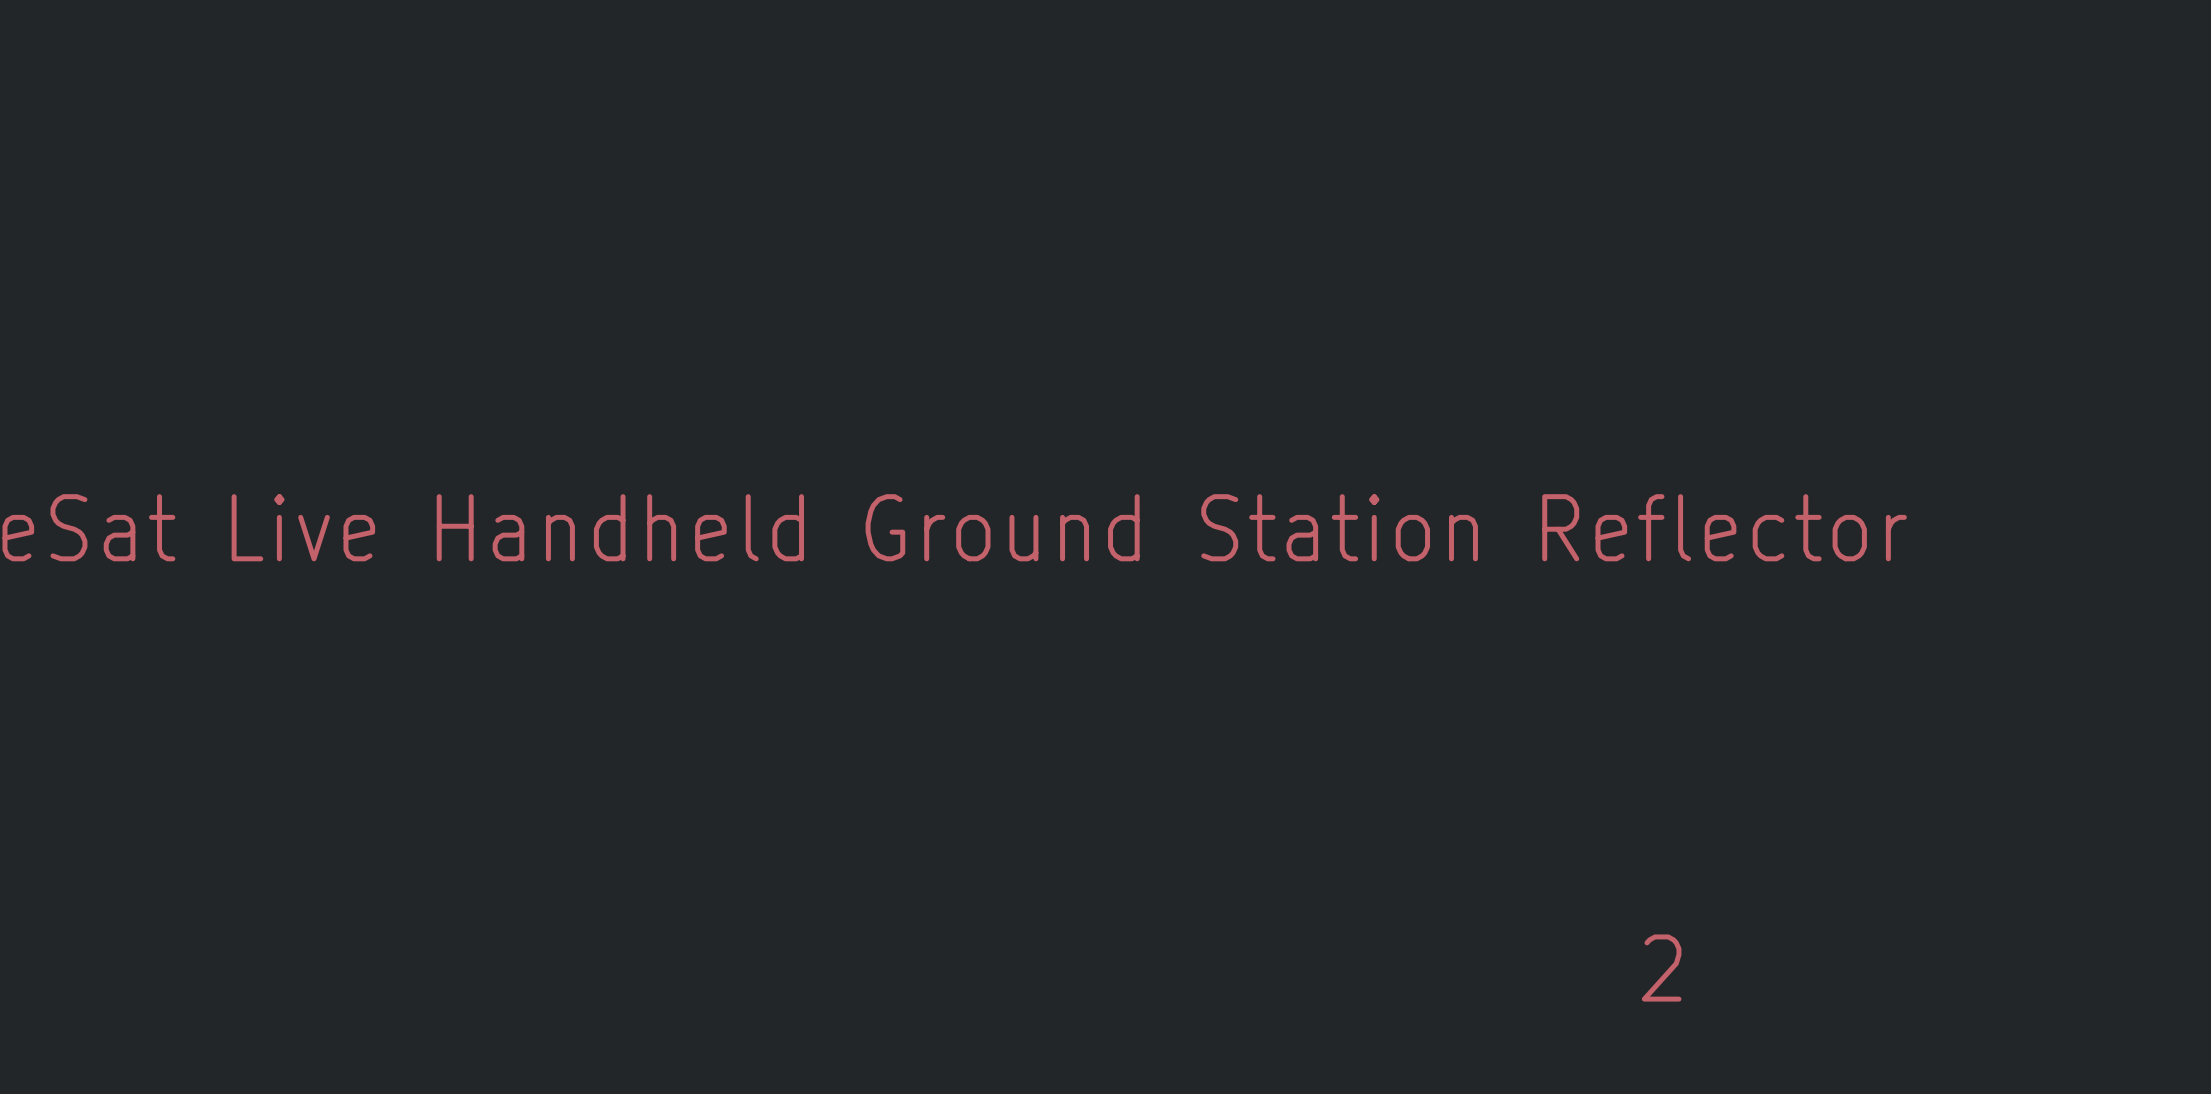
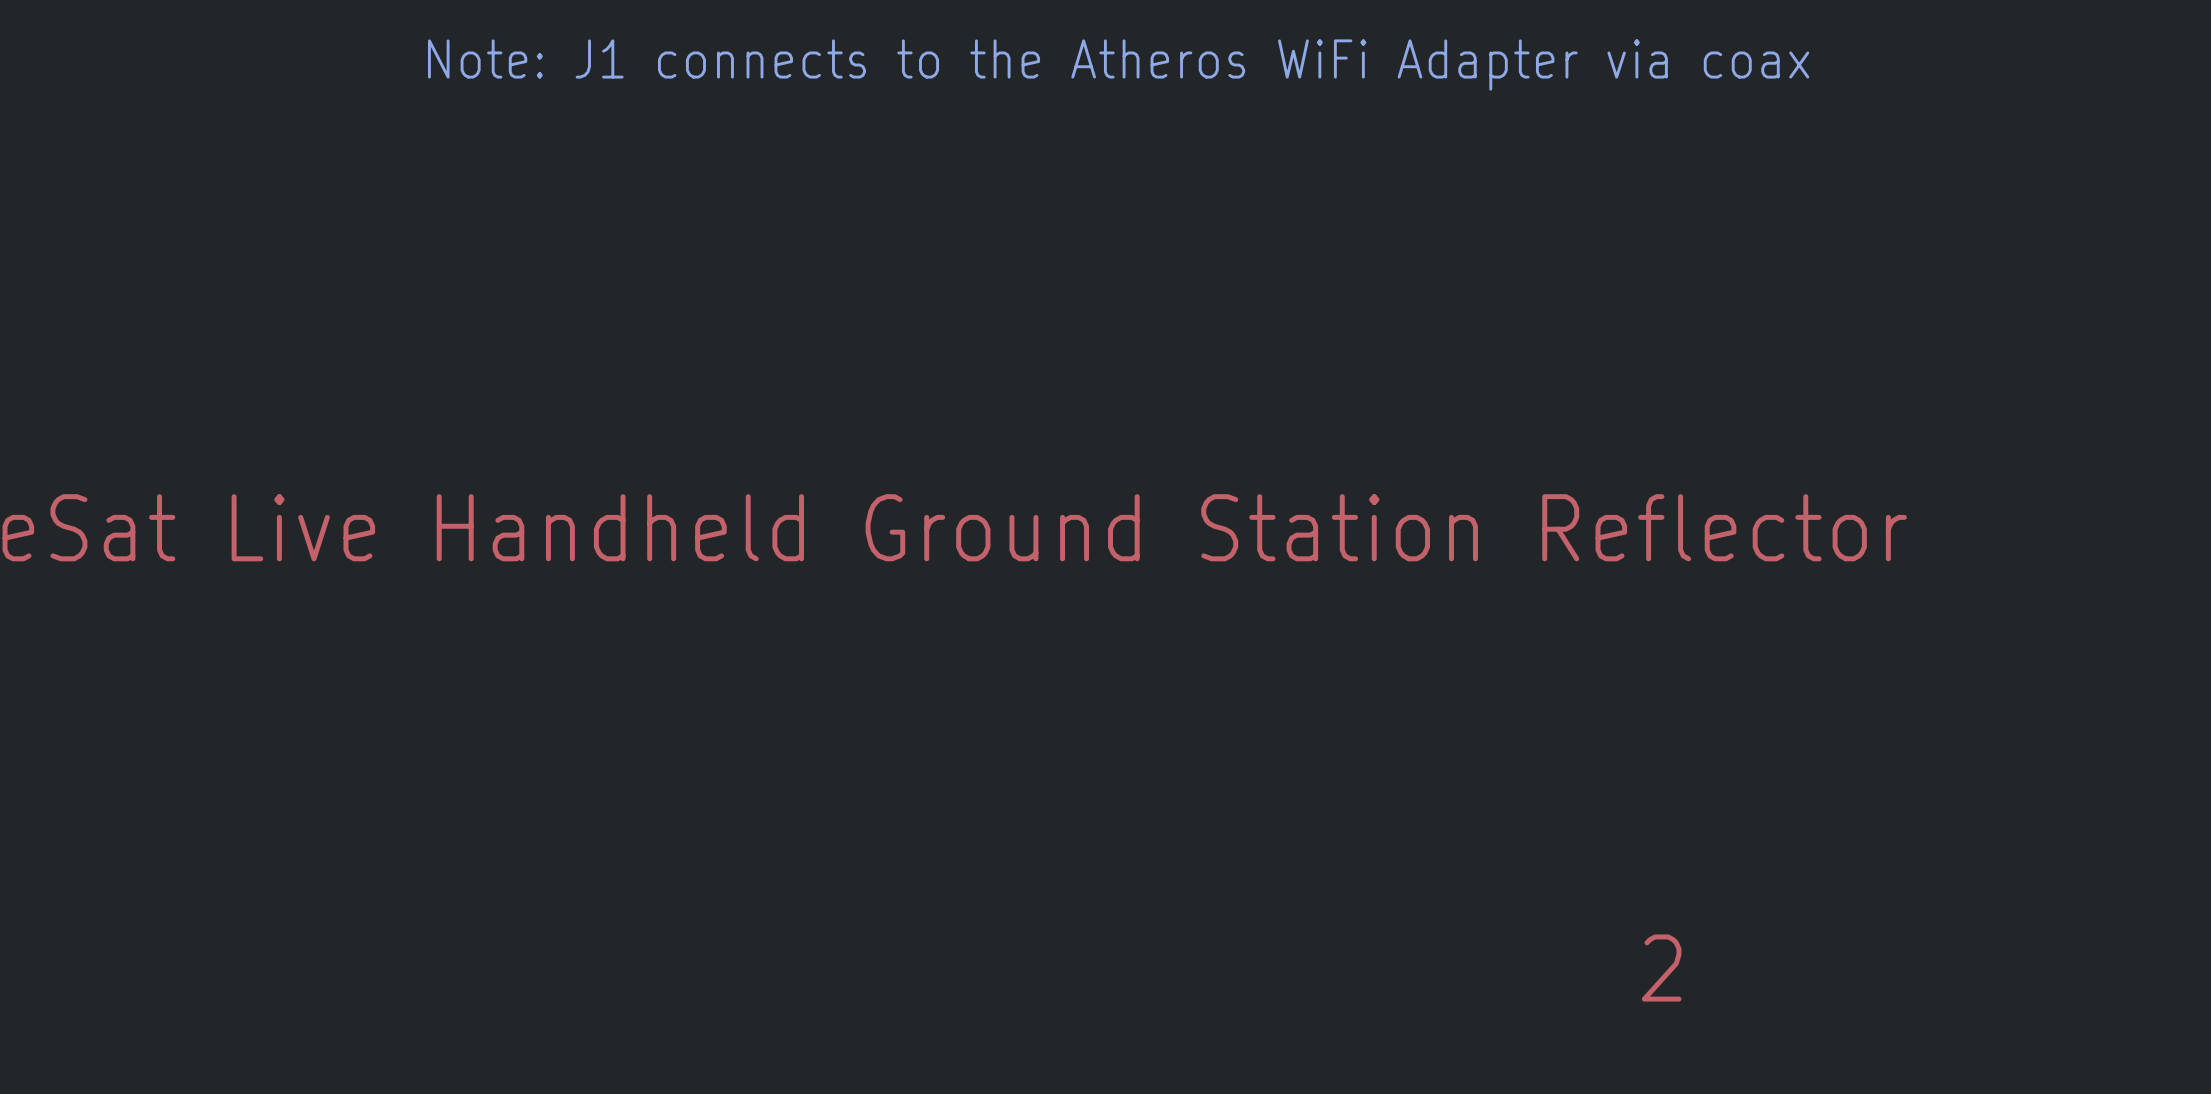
text: none -> Note: J1 connects to the Atheros WiFi Adapter via coax (1118, 65)

